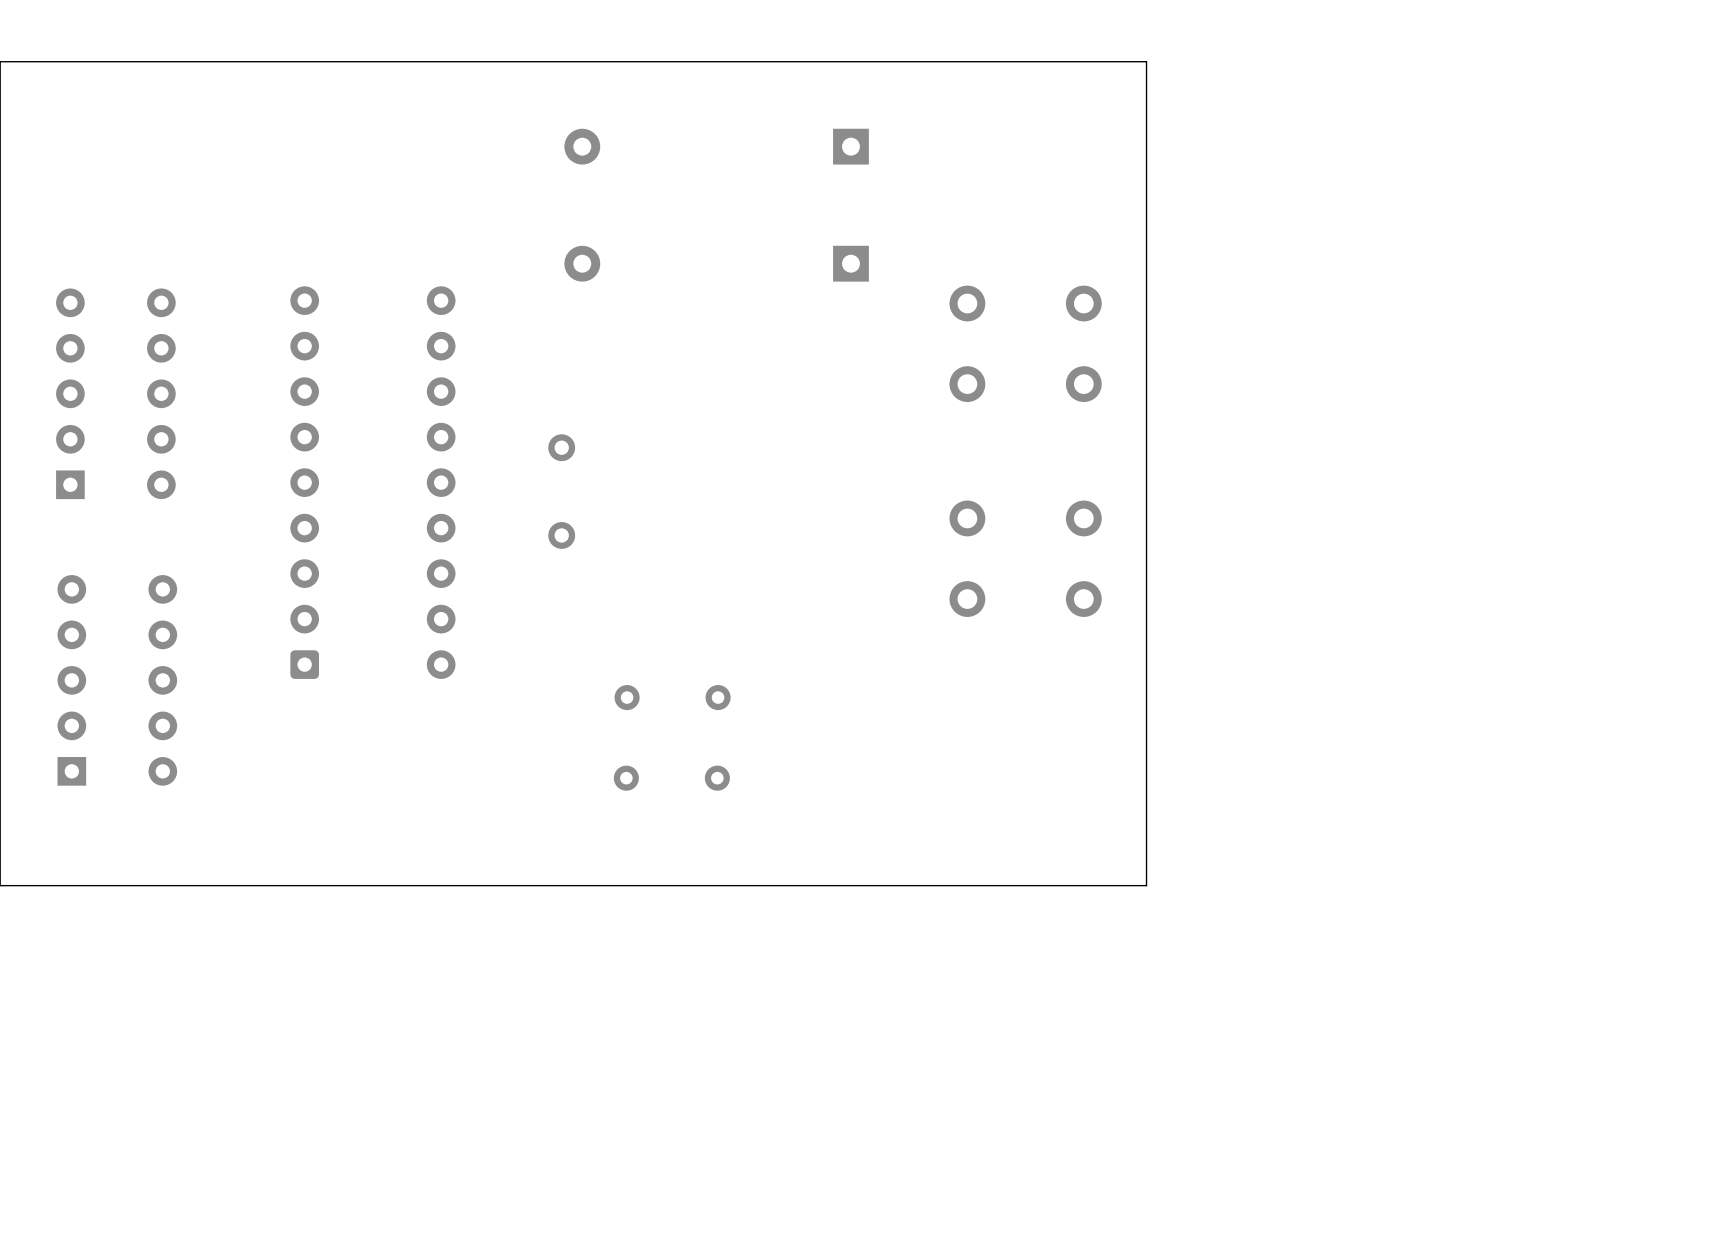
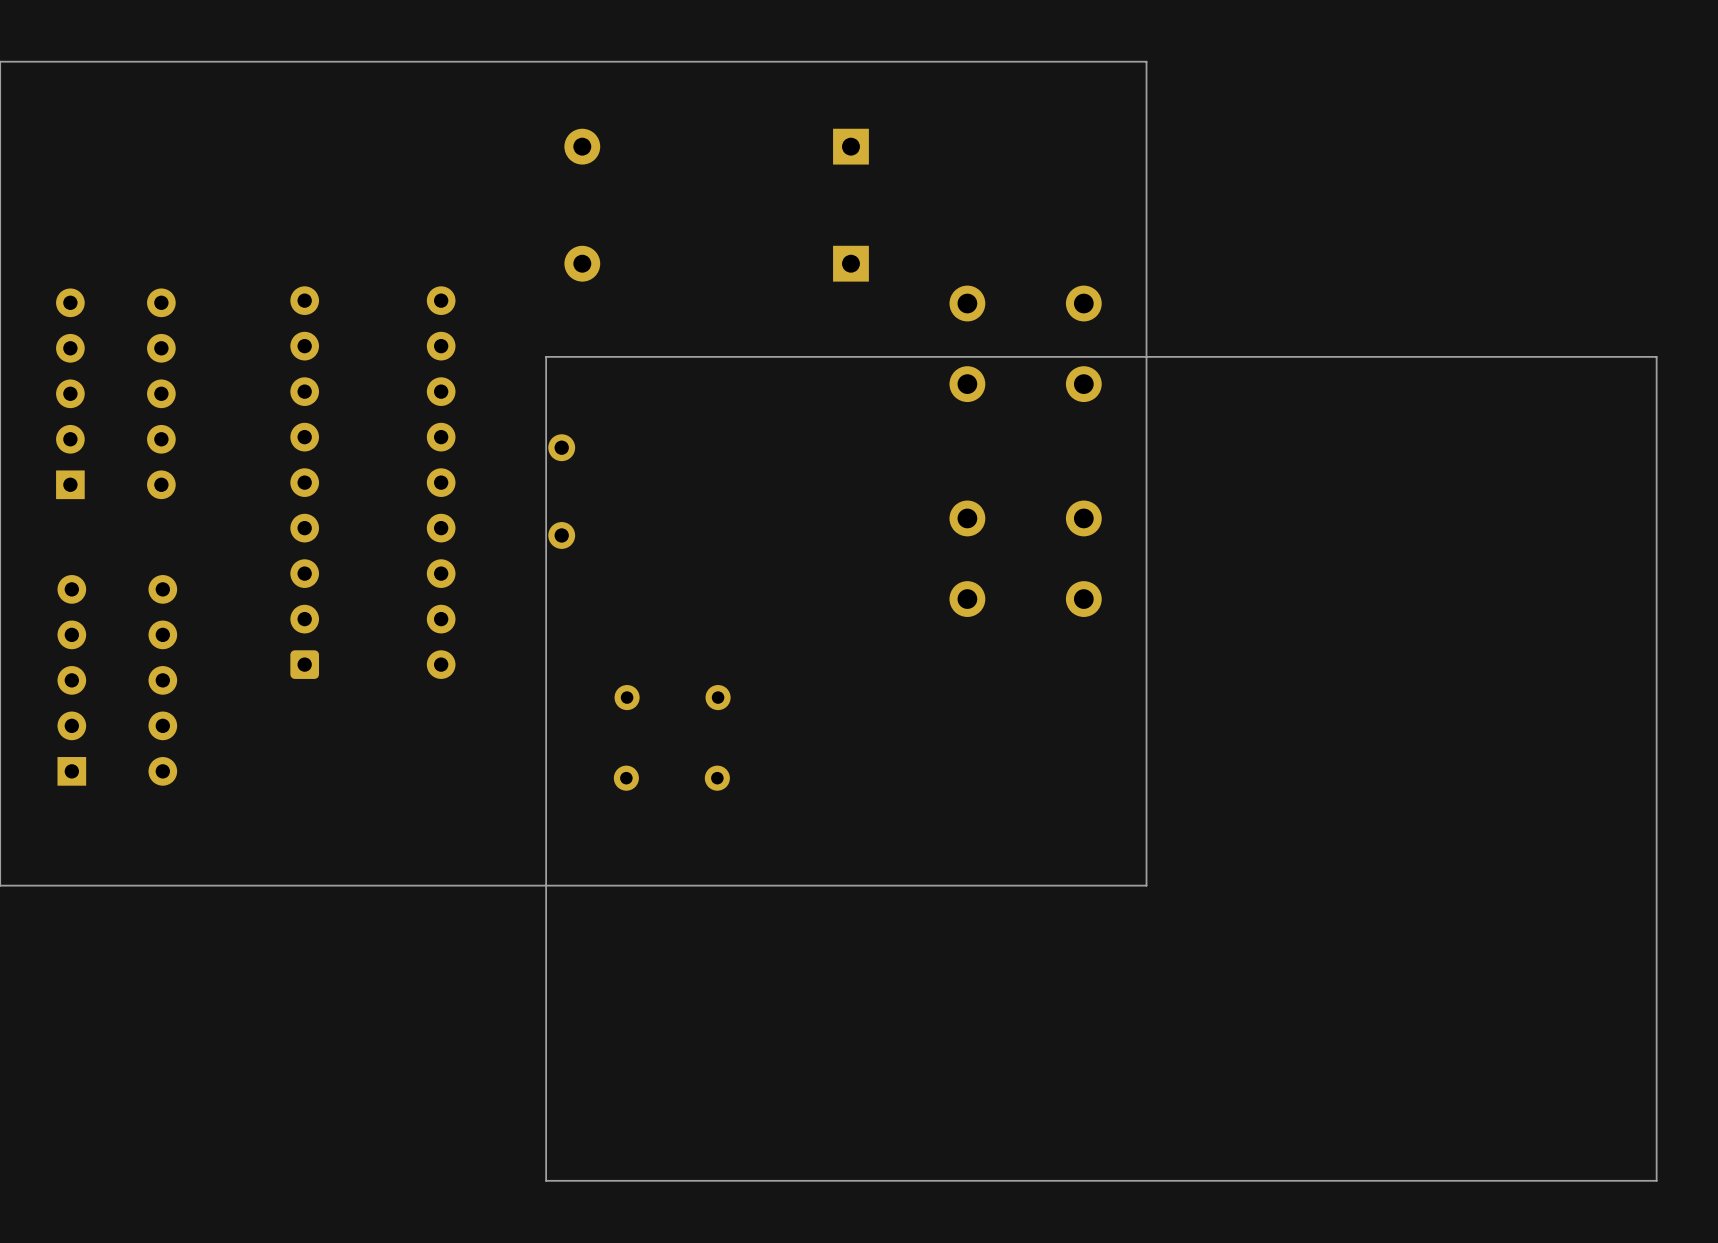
board edge: none -> (1656, 356) (1656, 1180) (546, 1180) (546, 356) (1656, 356)

